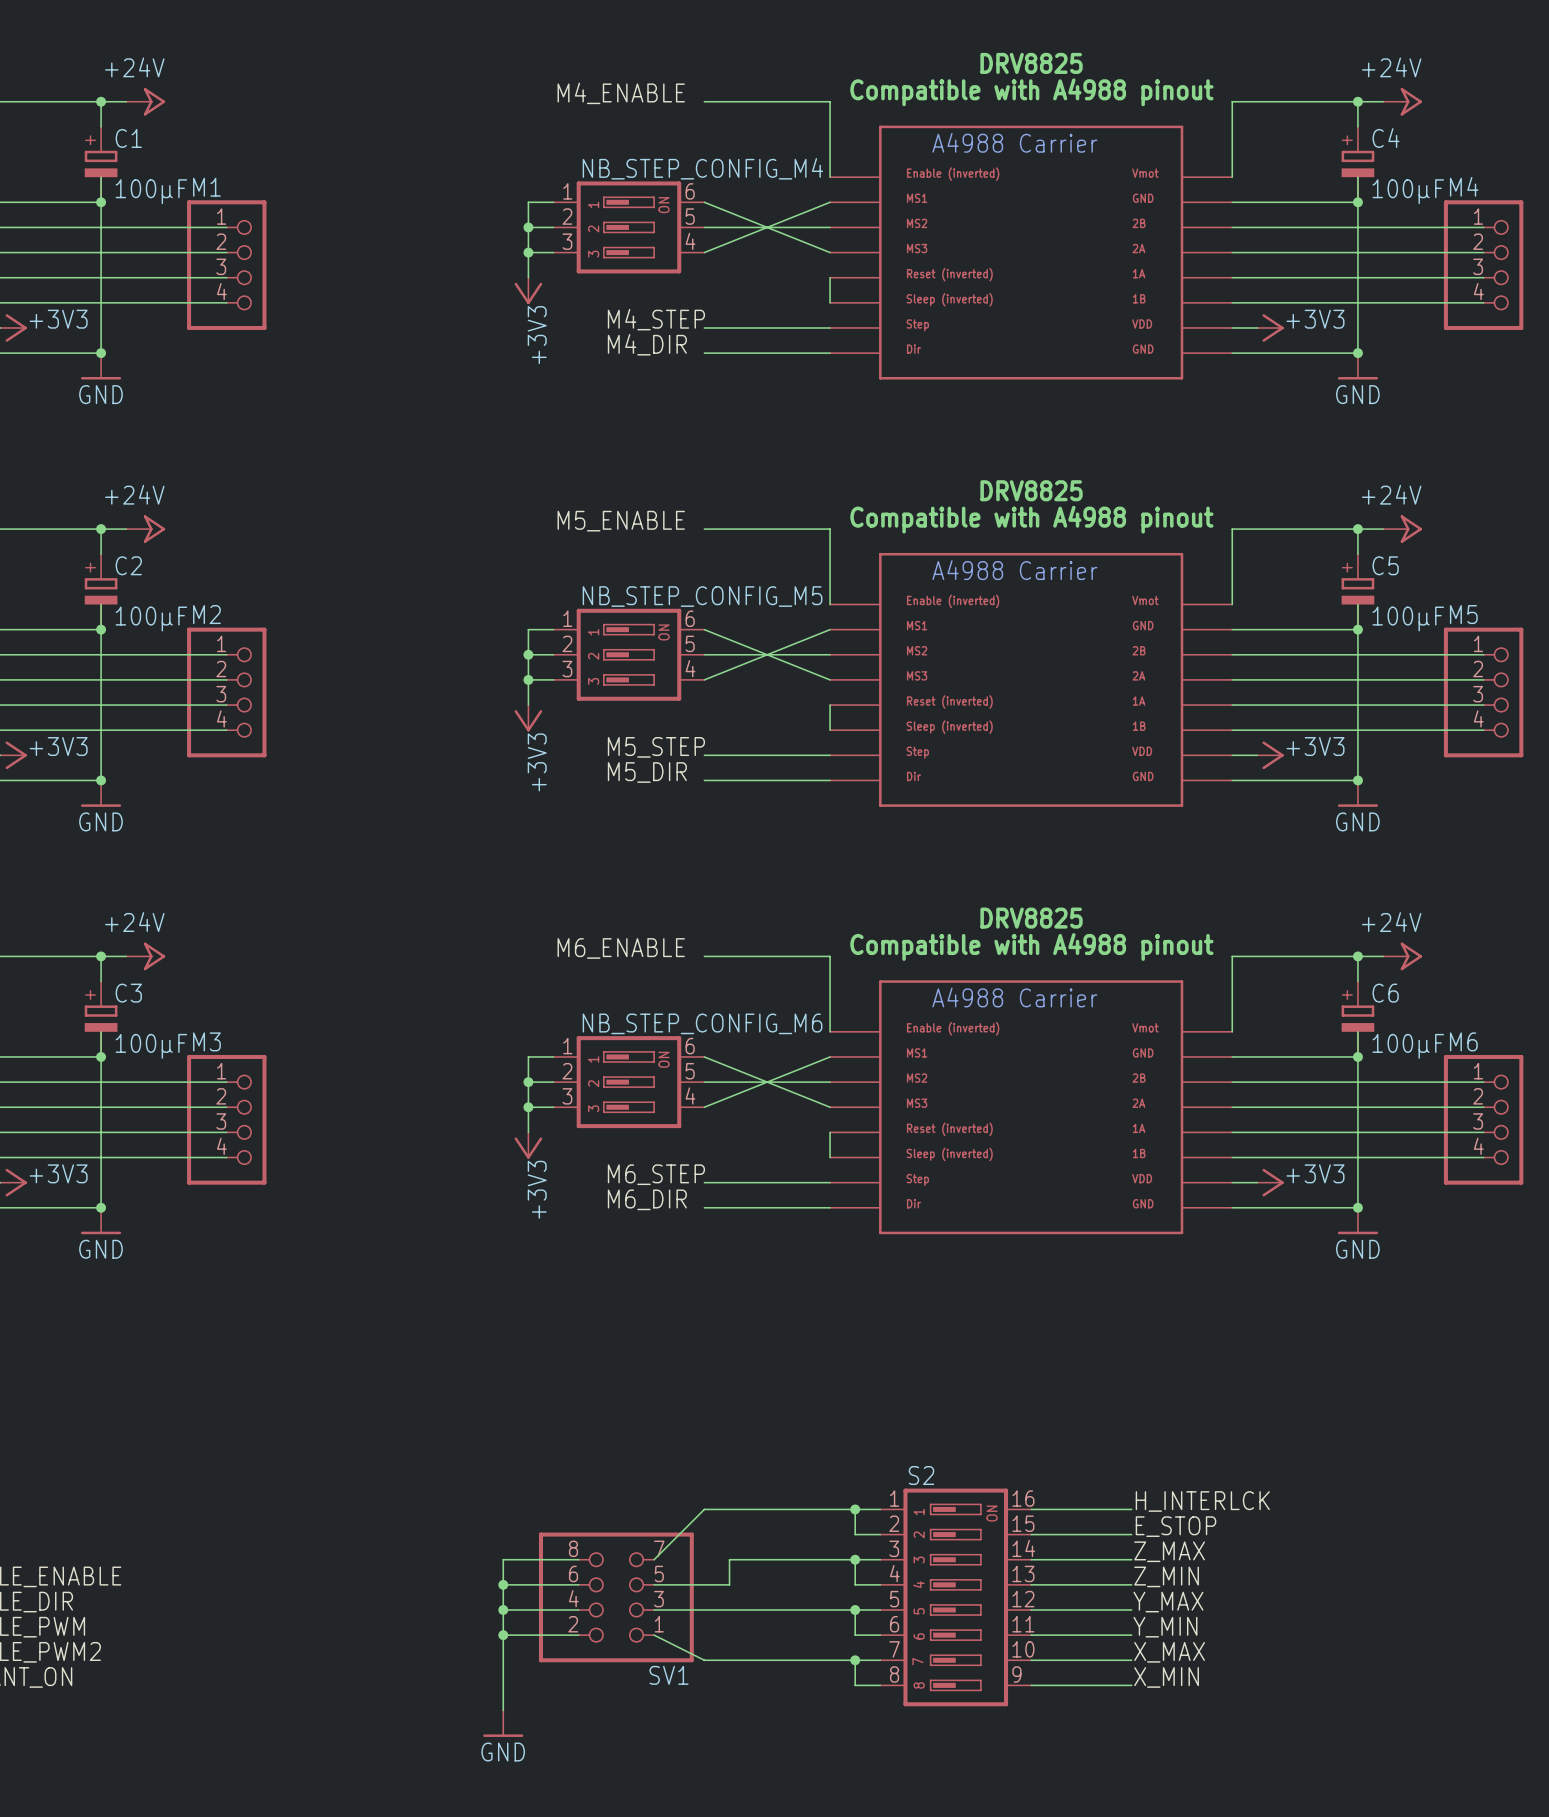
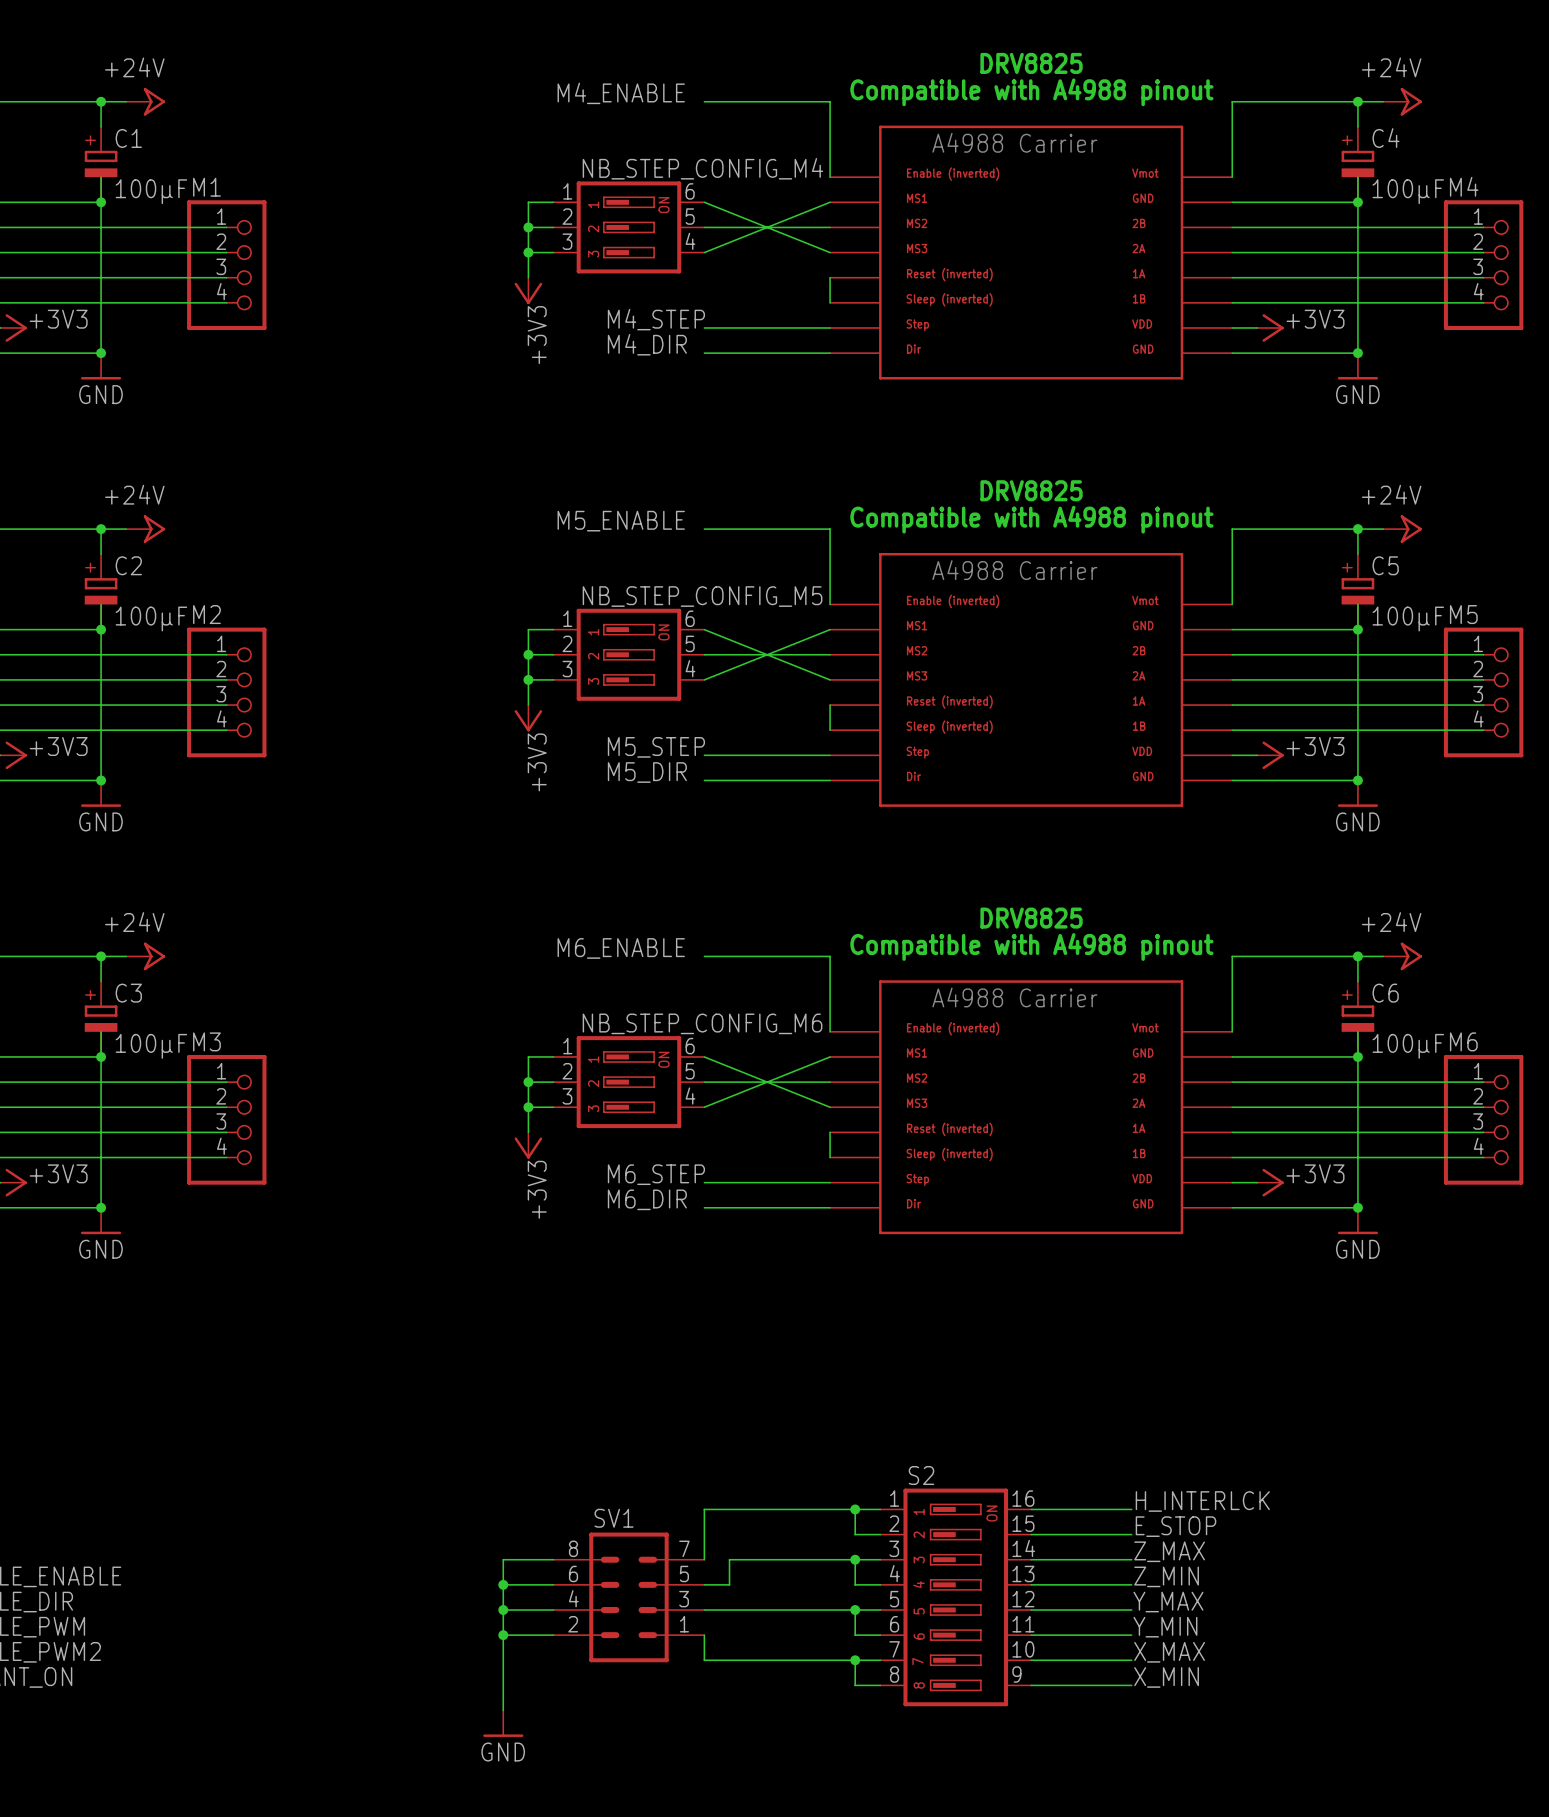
wire: (704, 1509) (654, 1559) -> (704, 1509) (704, 1559)
SV1 symbol: [538, 1532, 694, 1663] -> [553, 1532, 705, 1663]
wire: (654, 1635) (704, 1660) -> (704, 1635) (704, 1660)
SV1 name position: SV1 (669, 1675) -> SV1 (614, 1518)

